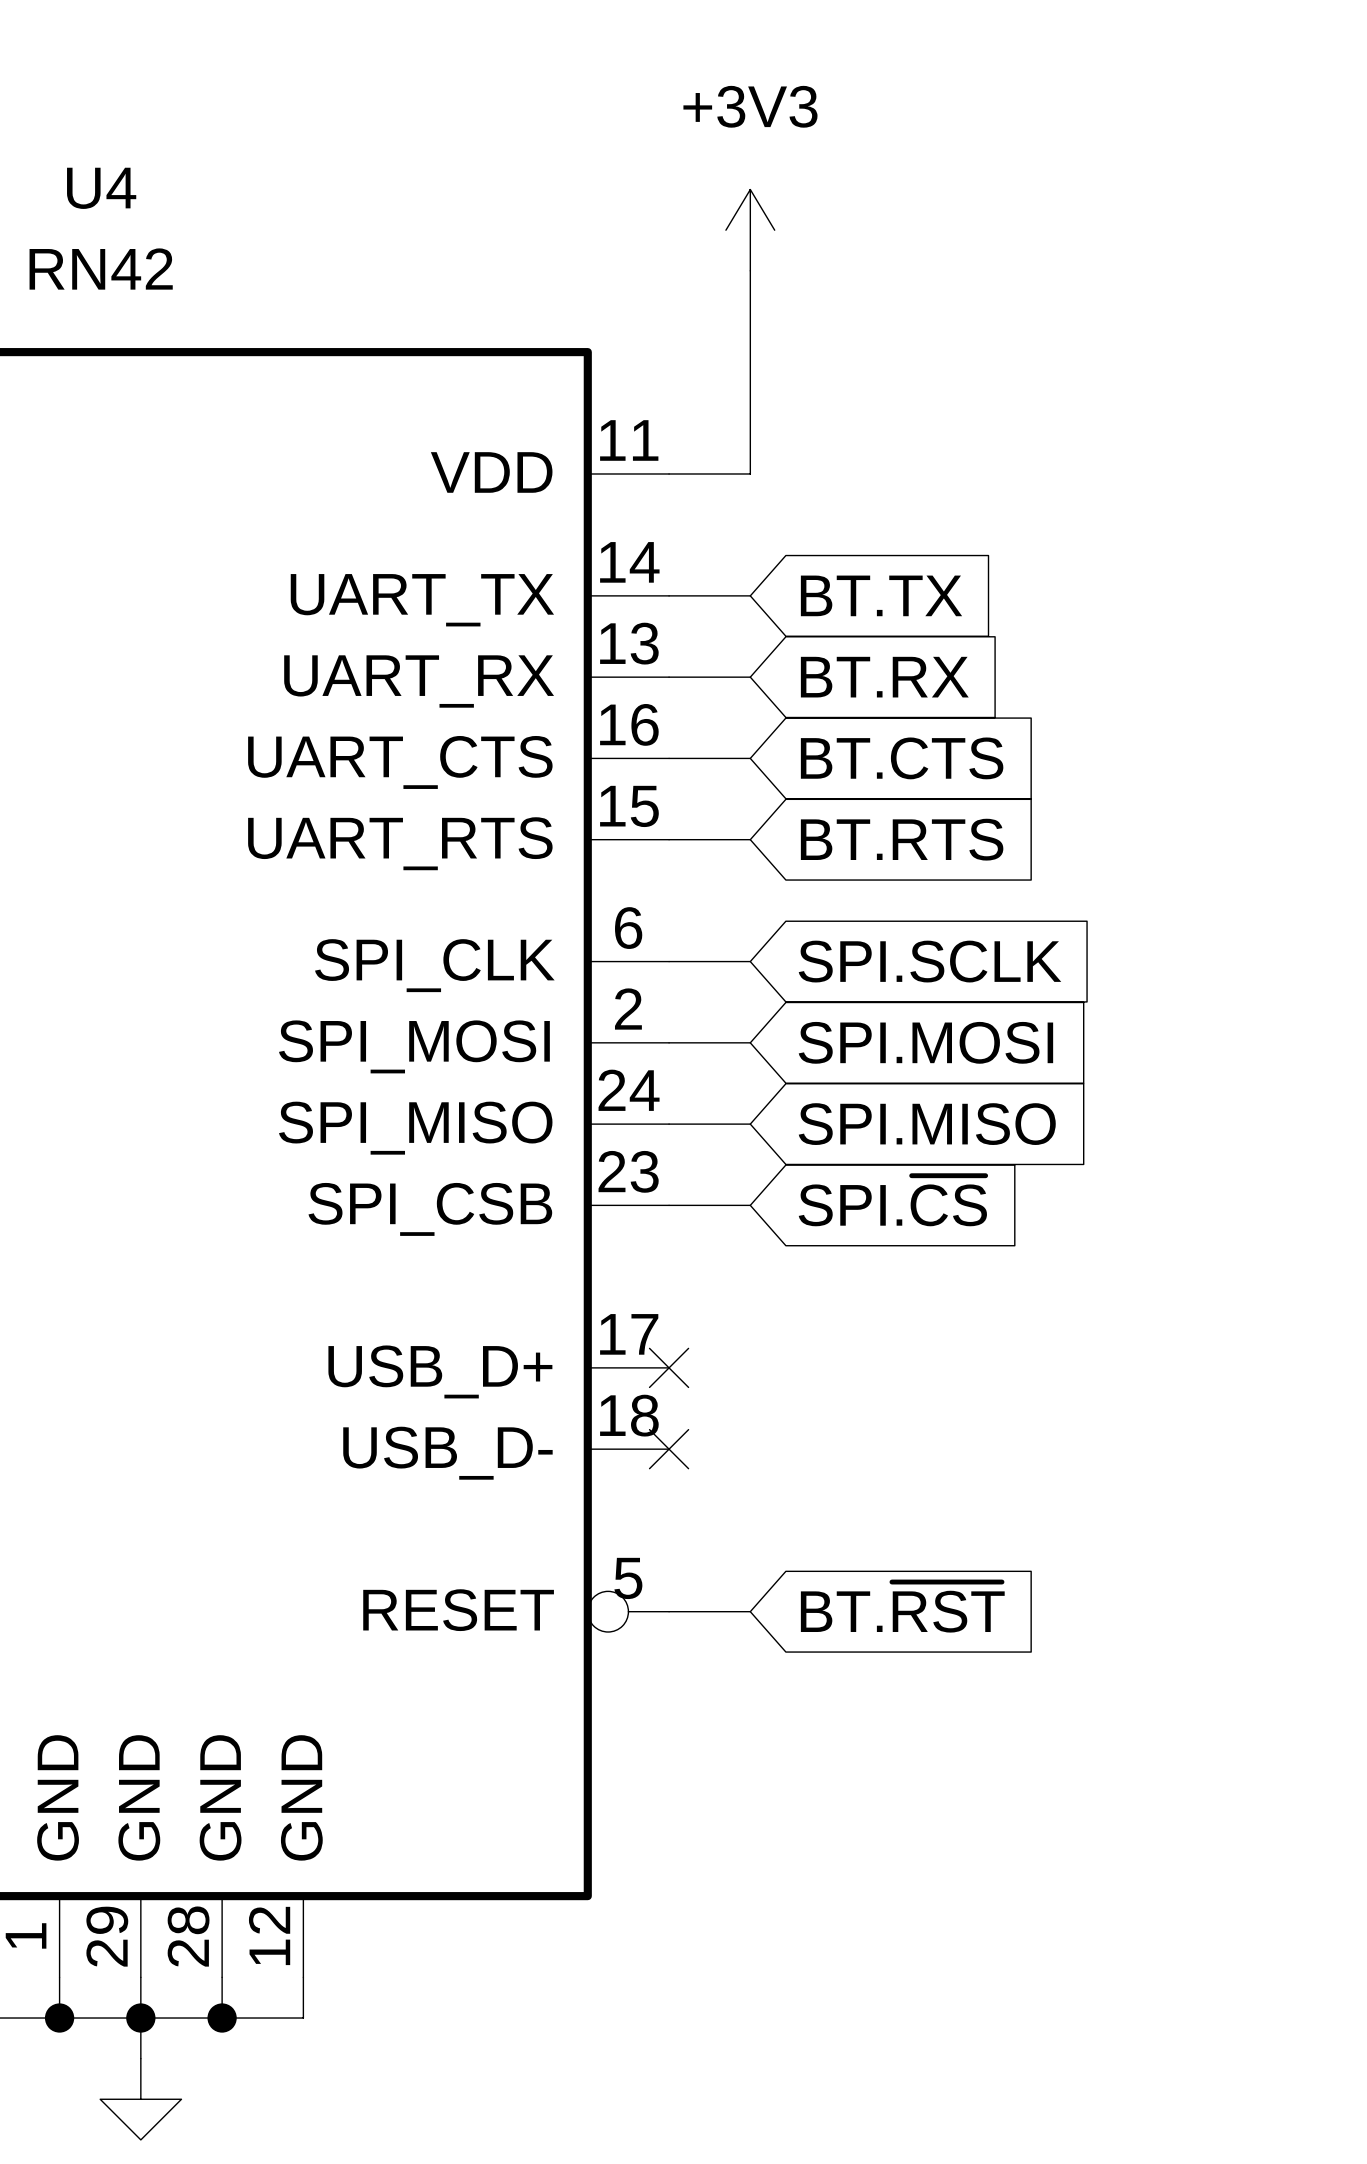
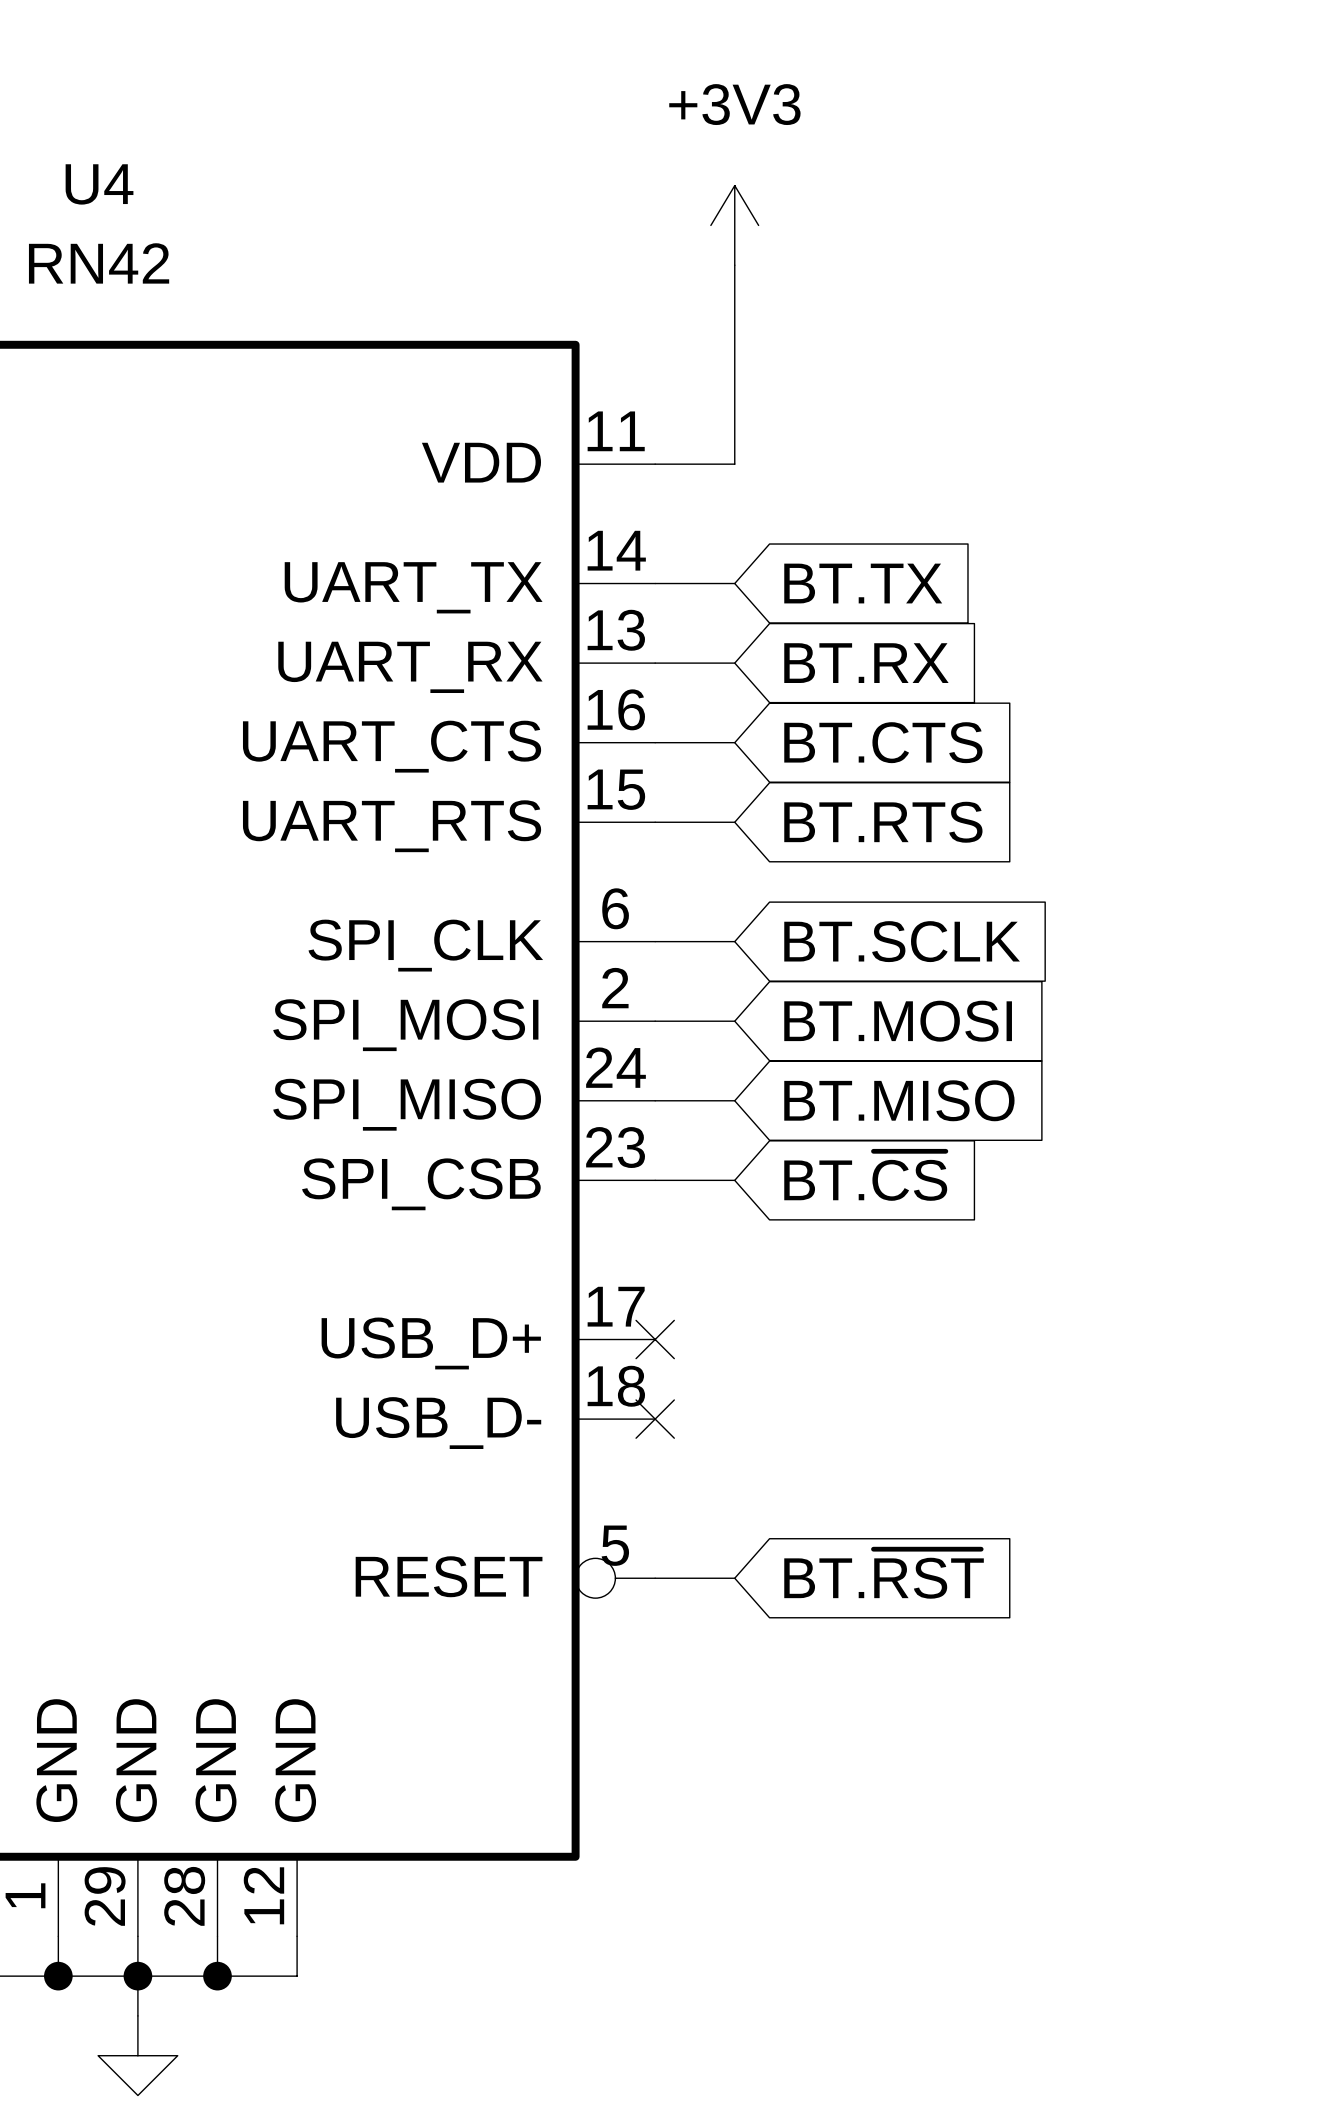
global label: SPI.SCLK (929, 961) -> BT.SCLK (902, 941)
global label: SPI.MOSI (925, 1042) -> BT.MOSI (898, 1021)
global label: SPI.MISO (927, 1124) -> BT.MISO (899, 1100)
global label: SPI.~{CS} (892, 1200) -> BT.~{CS} (865, 1176)

